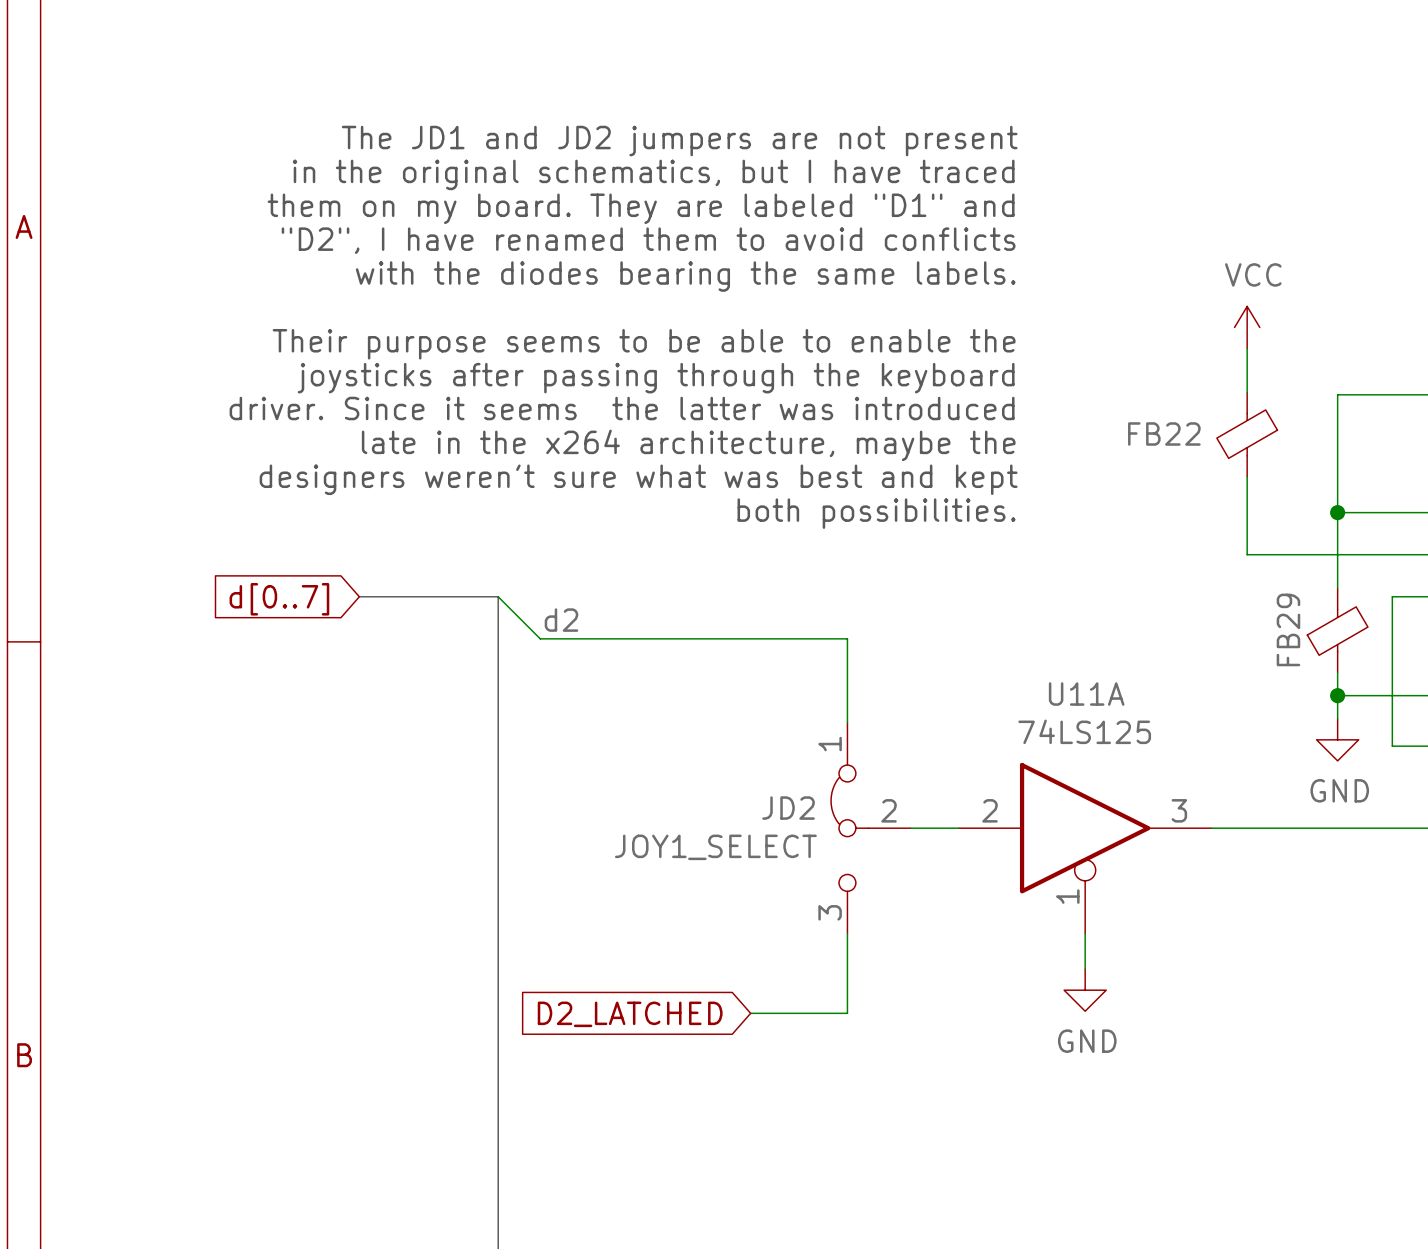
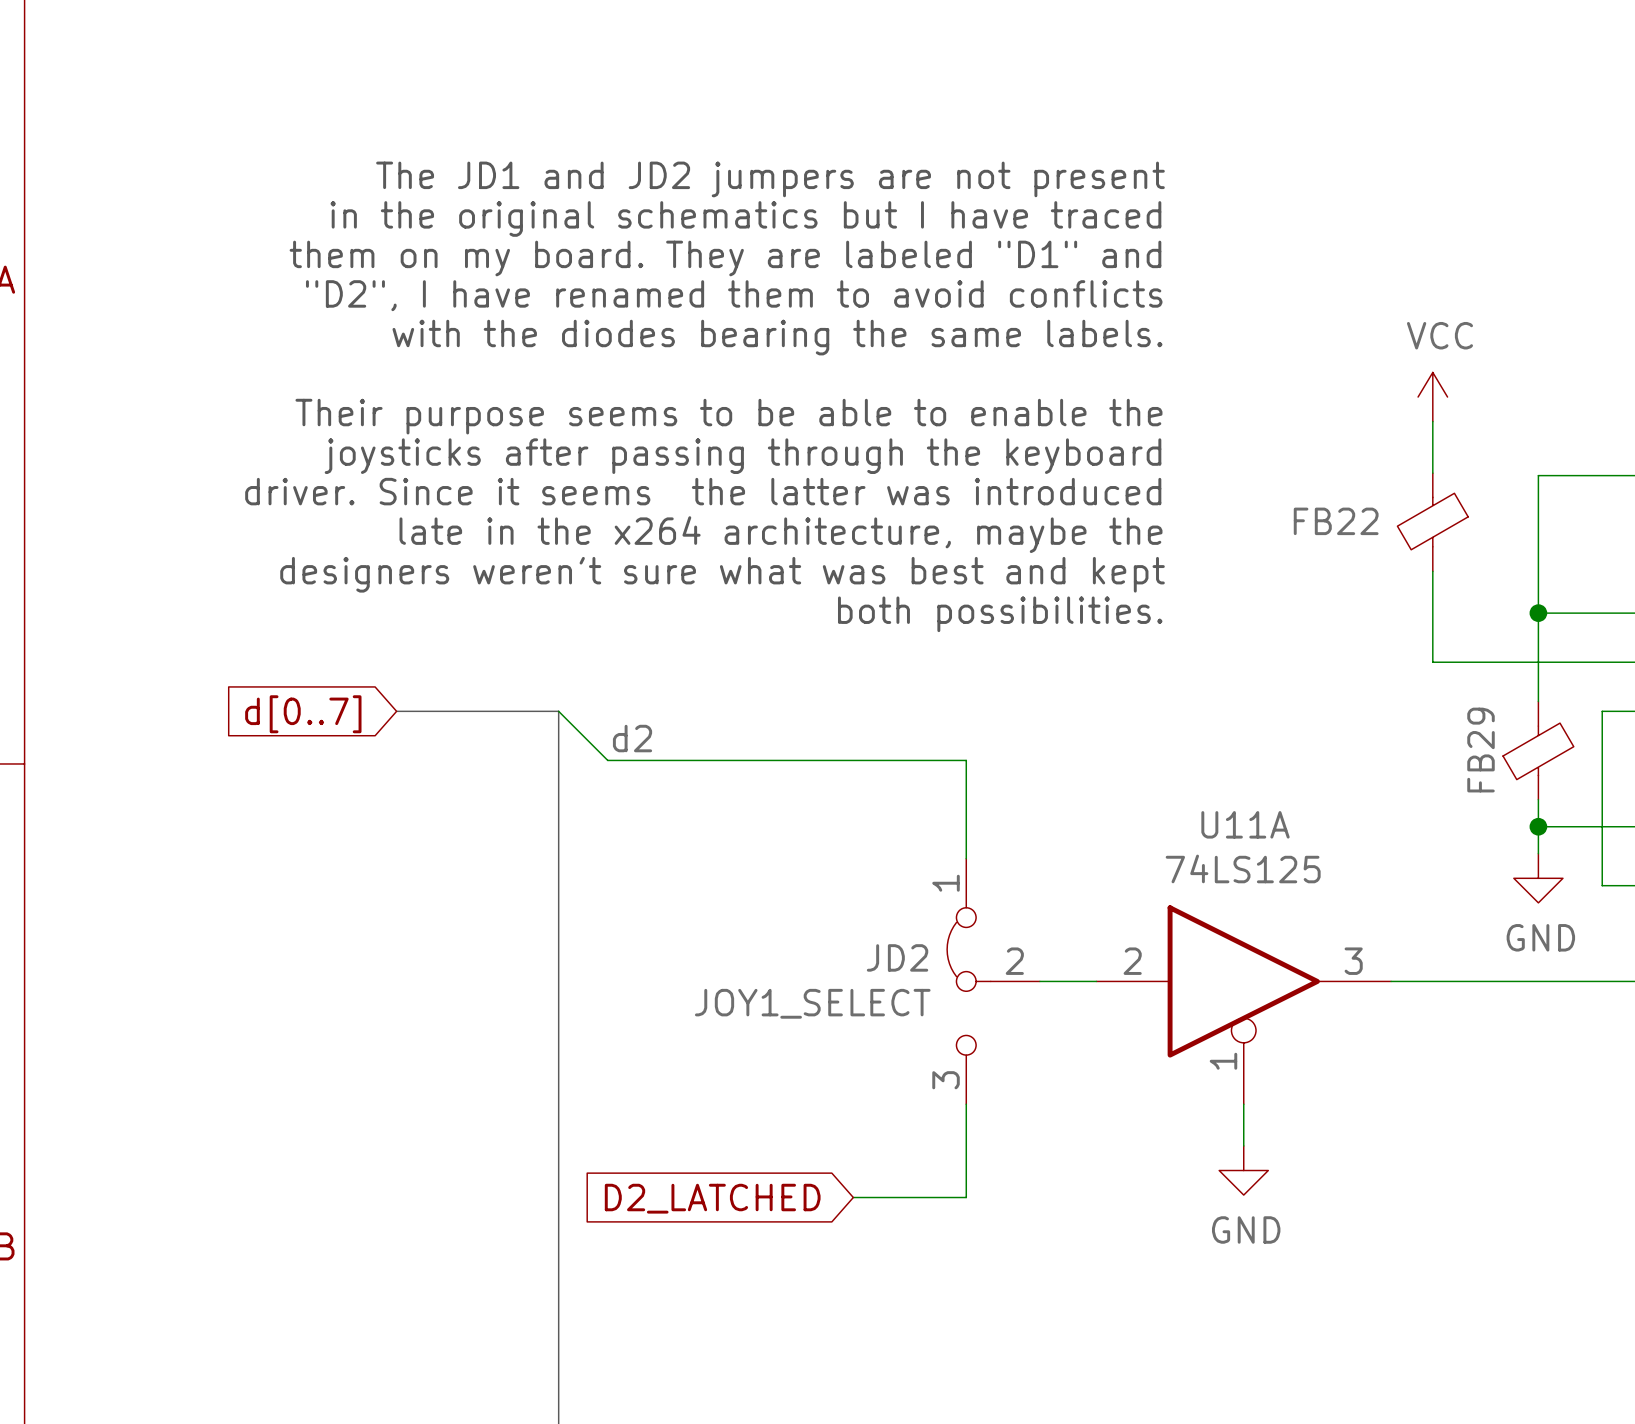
text: in the original schematics, but I have traced (653, 174) -> in the original schematics but I have traced (745, 218)

